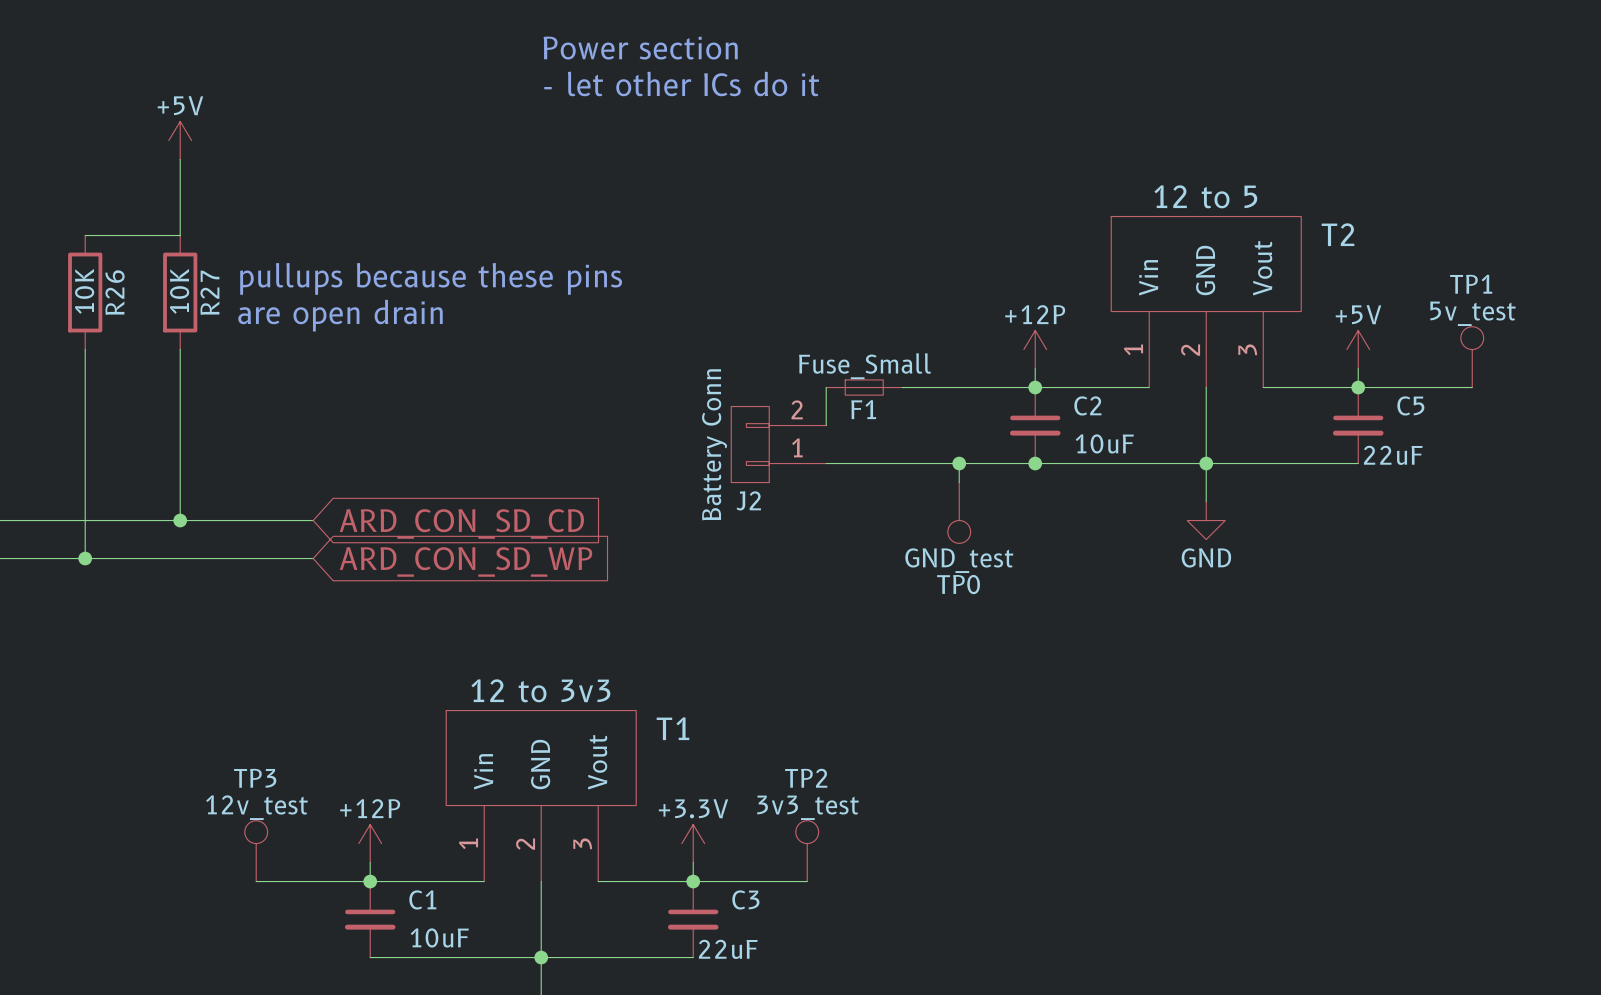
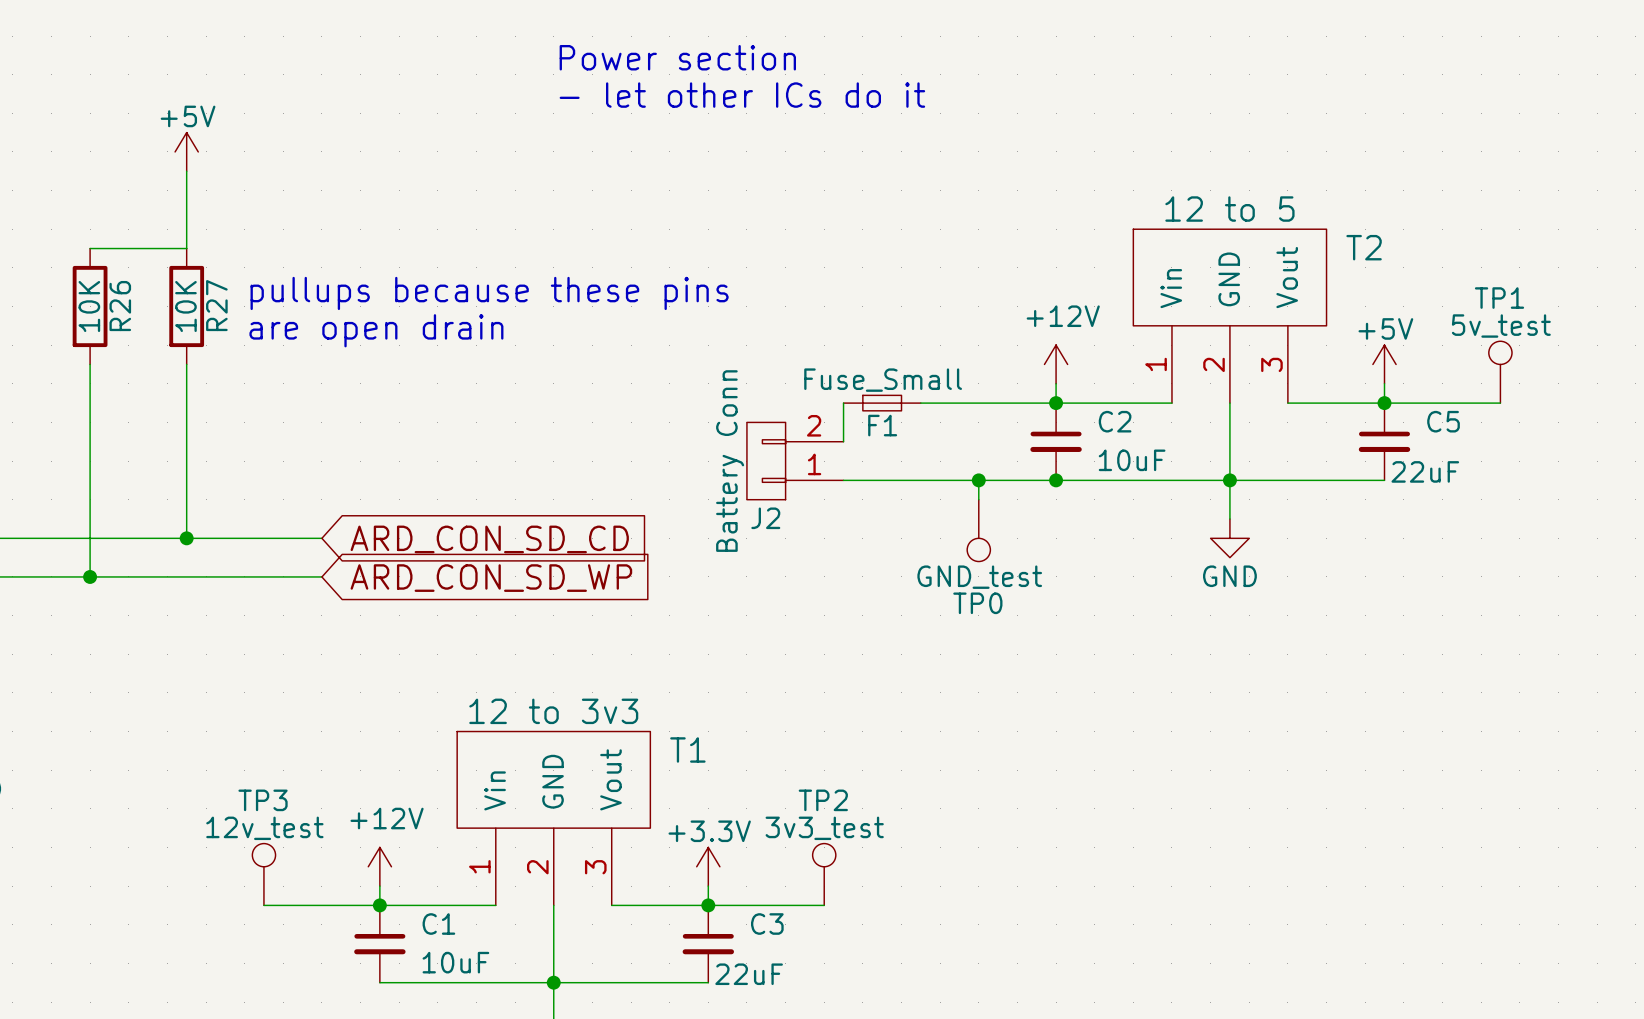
power symbol: +12P (1035, 349) -> +12V (1056, 364)
power symbol: +12P (370, 843) -> +12V (379, 866)

